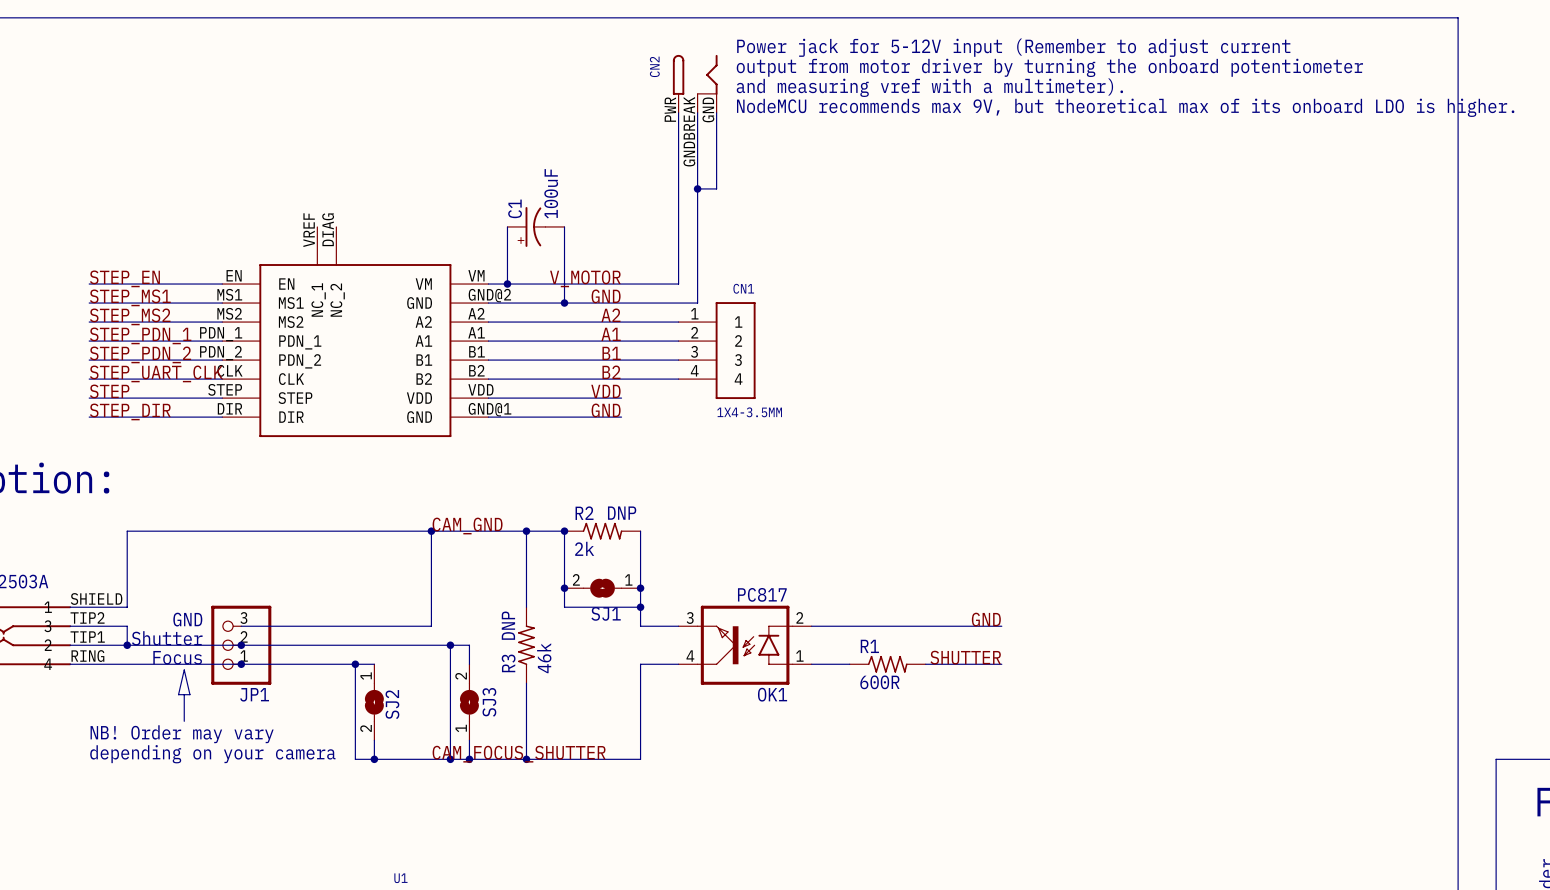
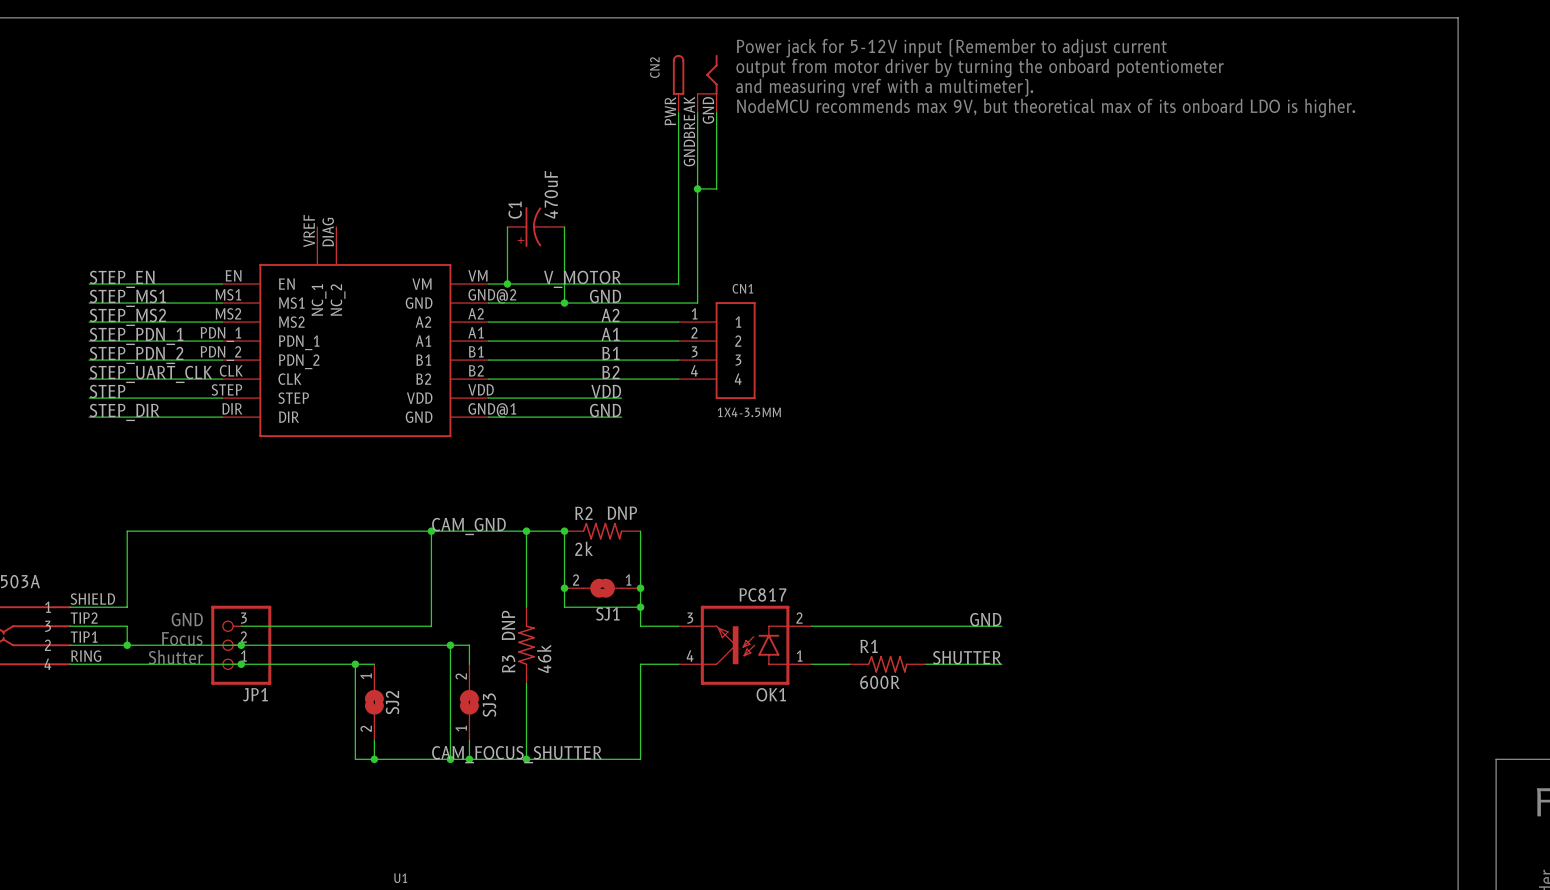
C1 value: 100uF (551, 193) -> 470uF (551, 194)
text: Shutter (167, 638) -> Focus (182, 638)
text: Focus (177, 657) -> Shutter (176, 657)
line: (184, 669) (189, 694) (178, 694) (184, 669) -> none
line: (184, 694) (184, 721) -> none
text: NB! Order may vary (182, 734) -> none
text: depending on your camera (212, 754) -> none

